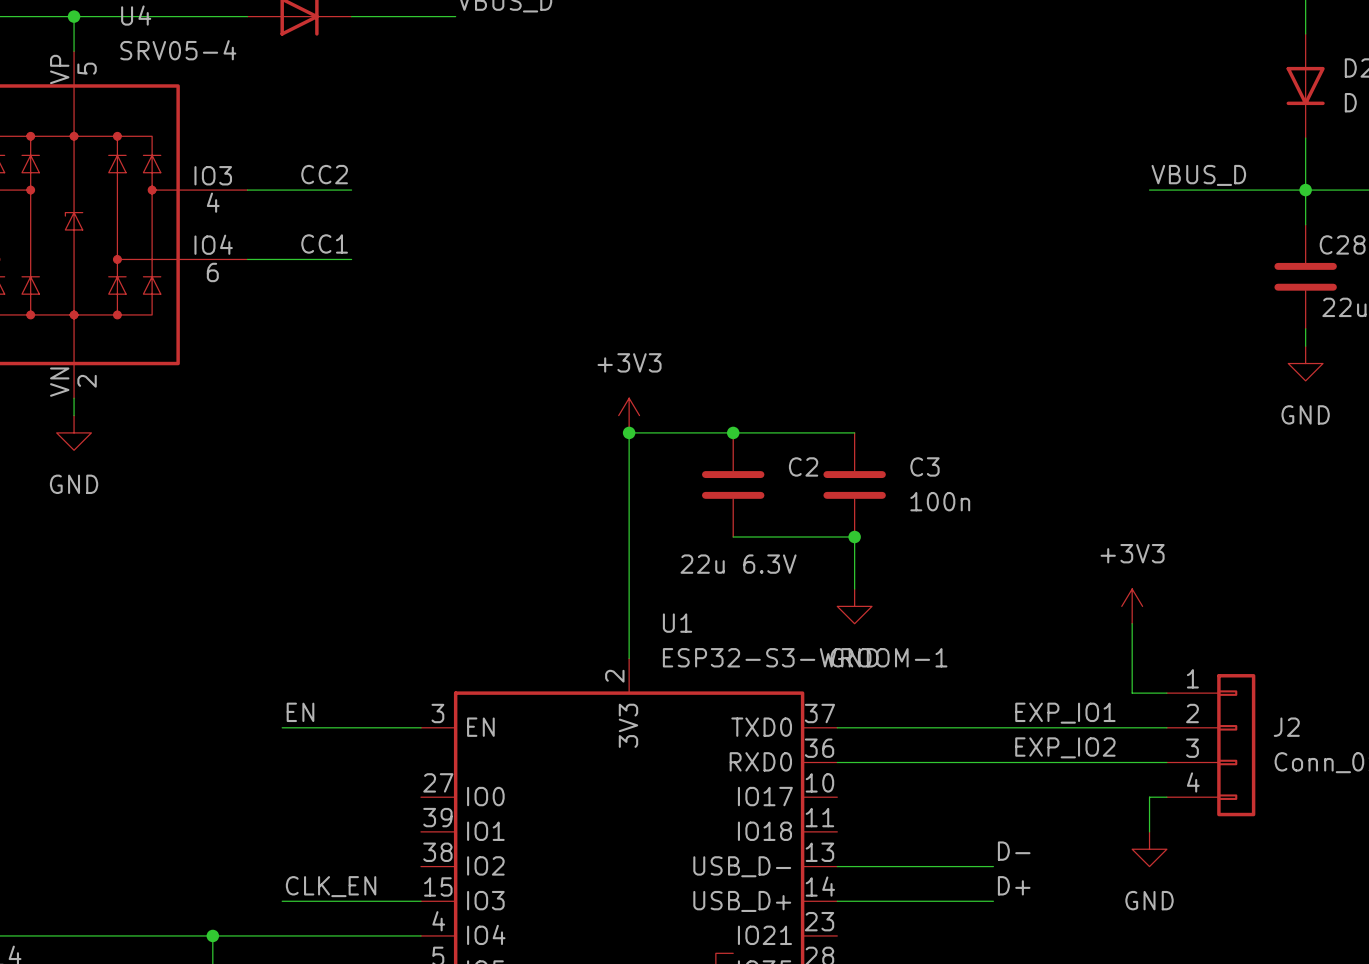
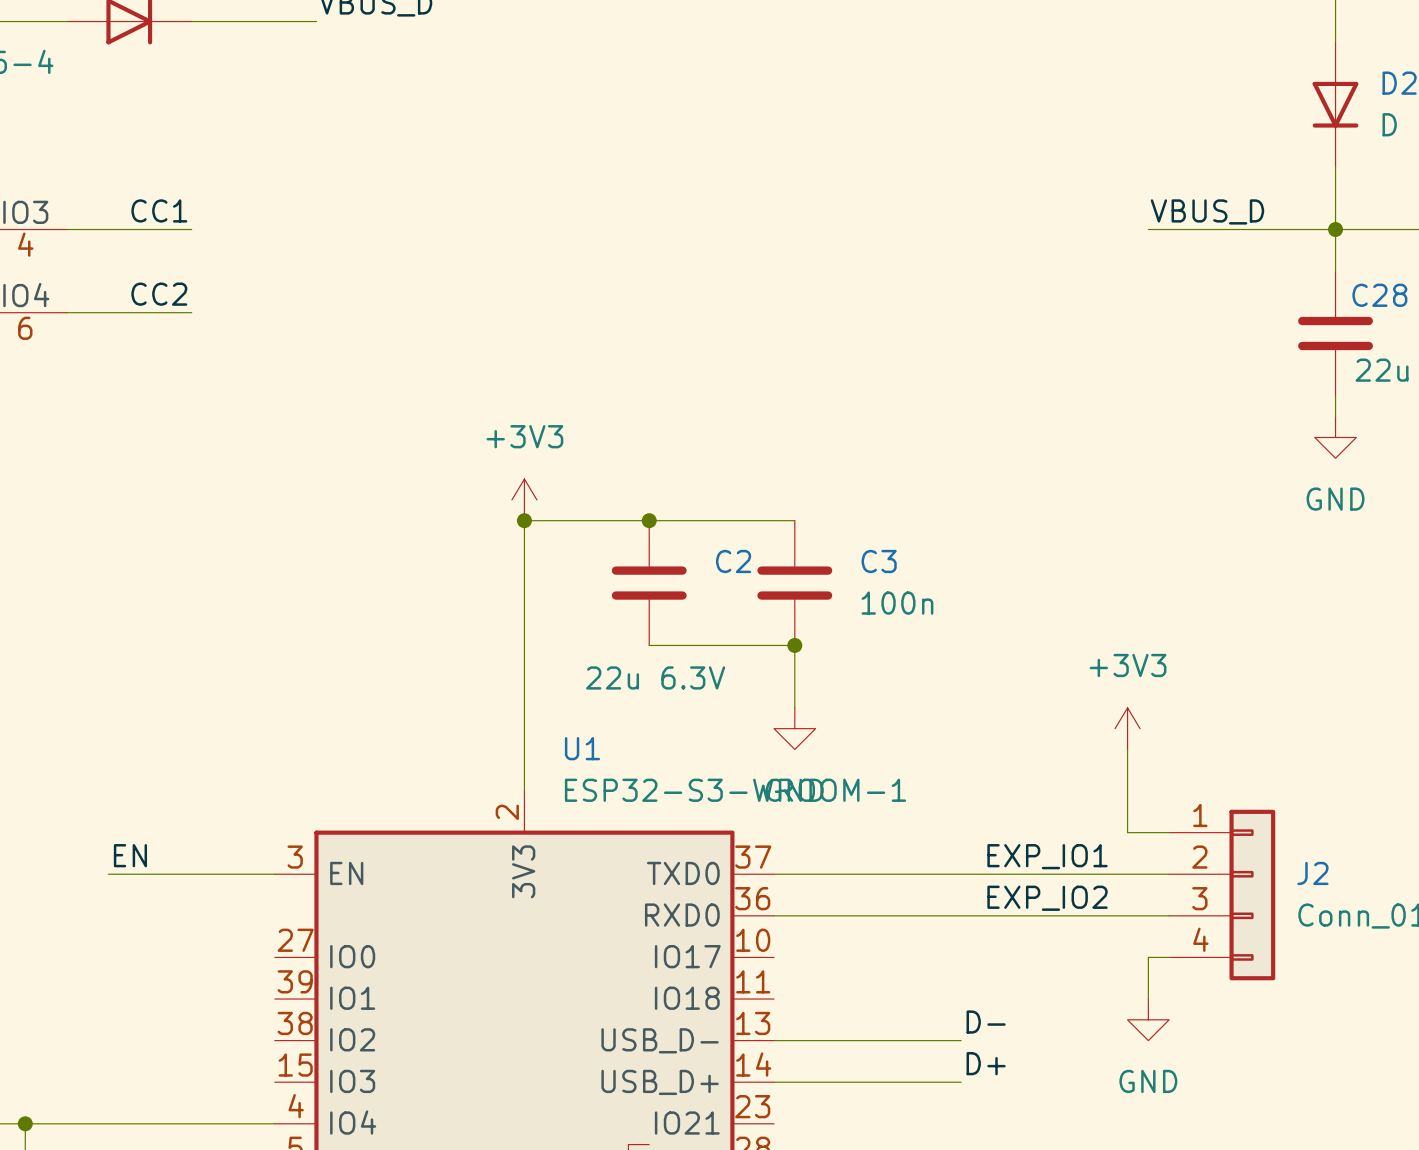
label: CC2 (324, 174) -> CC1 (159, 210)
label: CC1 (324, 243) -> CC2 (159, 294)
label: CLK_EN (331, 886) -> none
wire: (282, 901) (420, 901) -> none

